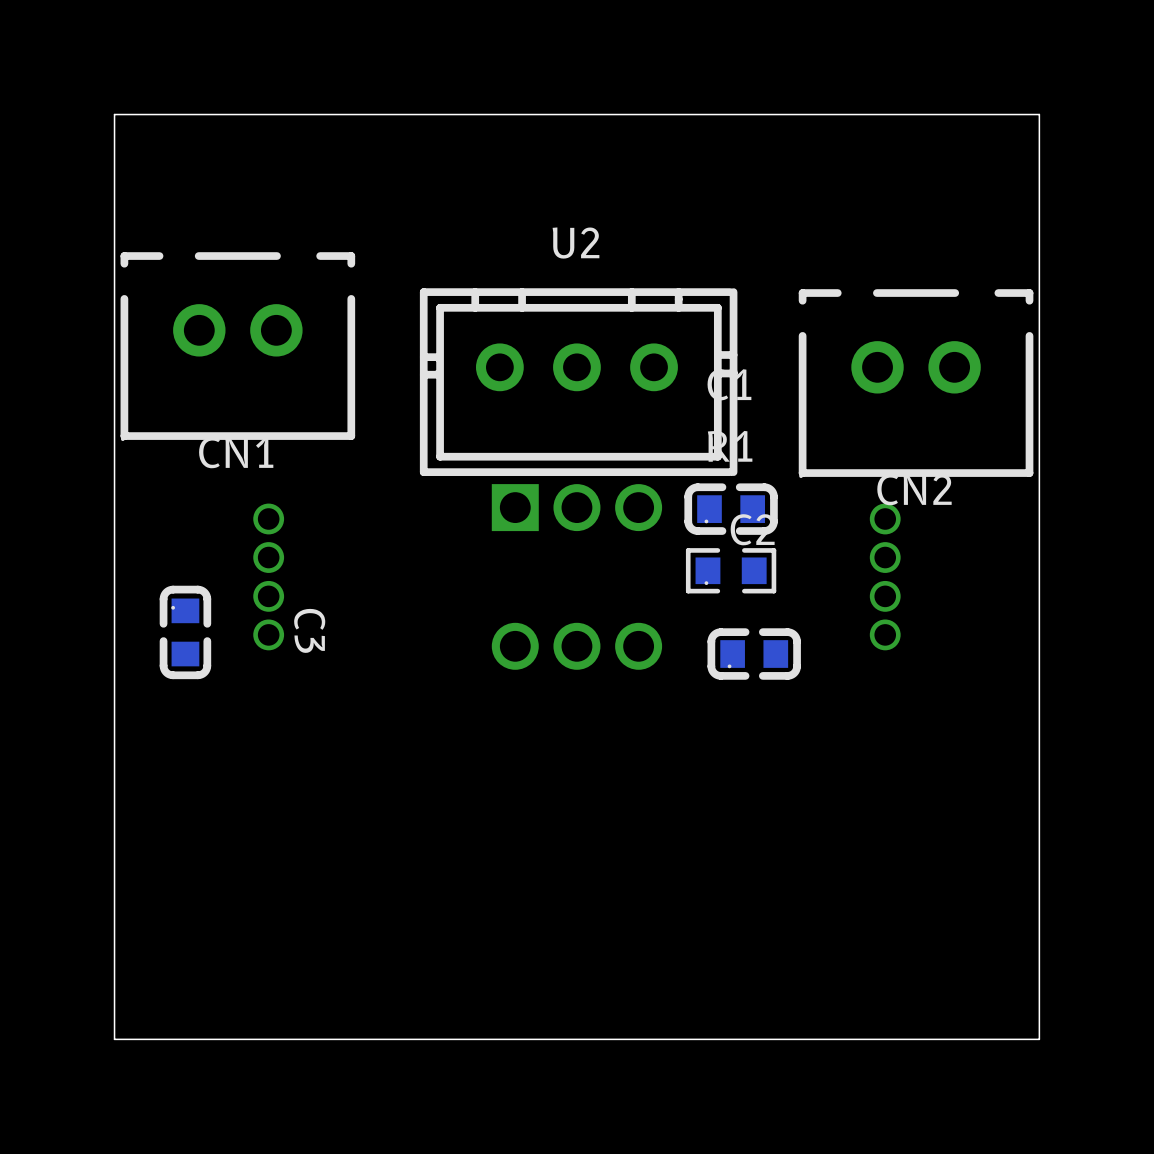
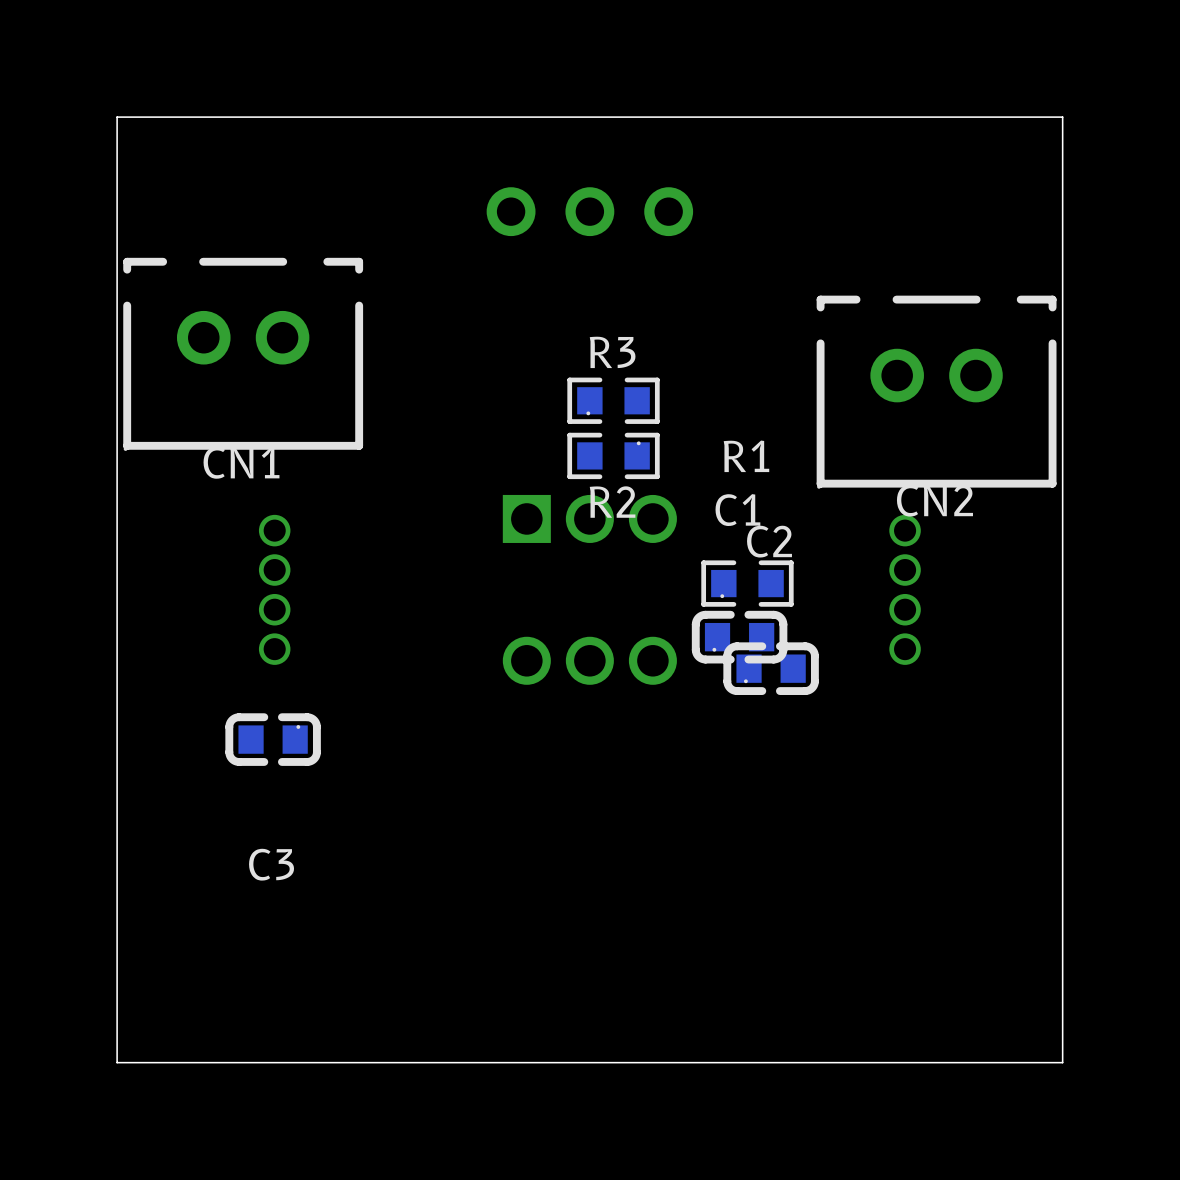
U2 side: bottom (578, 382) -> top (589, 211)
R3: none -> (613, 400)
R2: none -> (613, 455)
C1 position: (731, 509) -> (739, 637)
C3 rotation: 0° (185, 632) -> 90° clockwise (273, 739)
C3 position: (185, 632) -> (273, 739)

